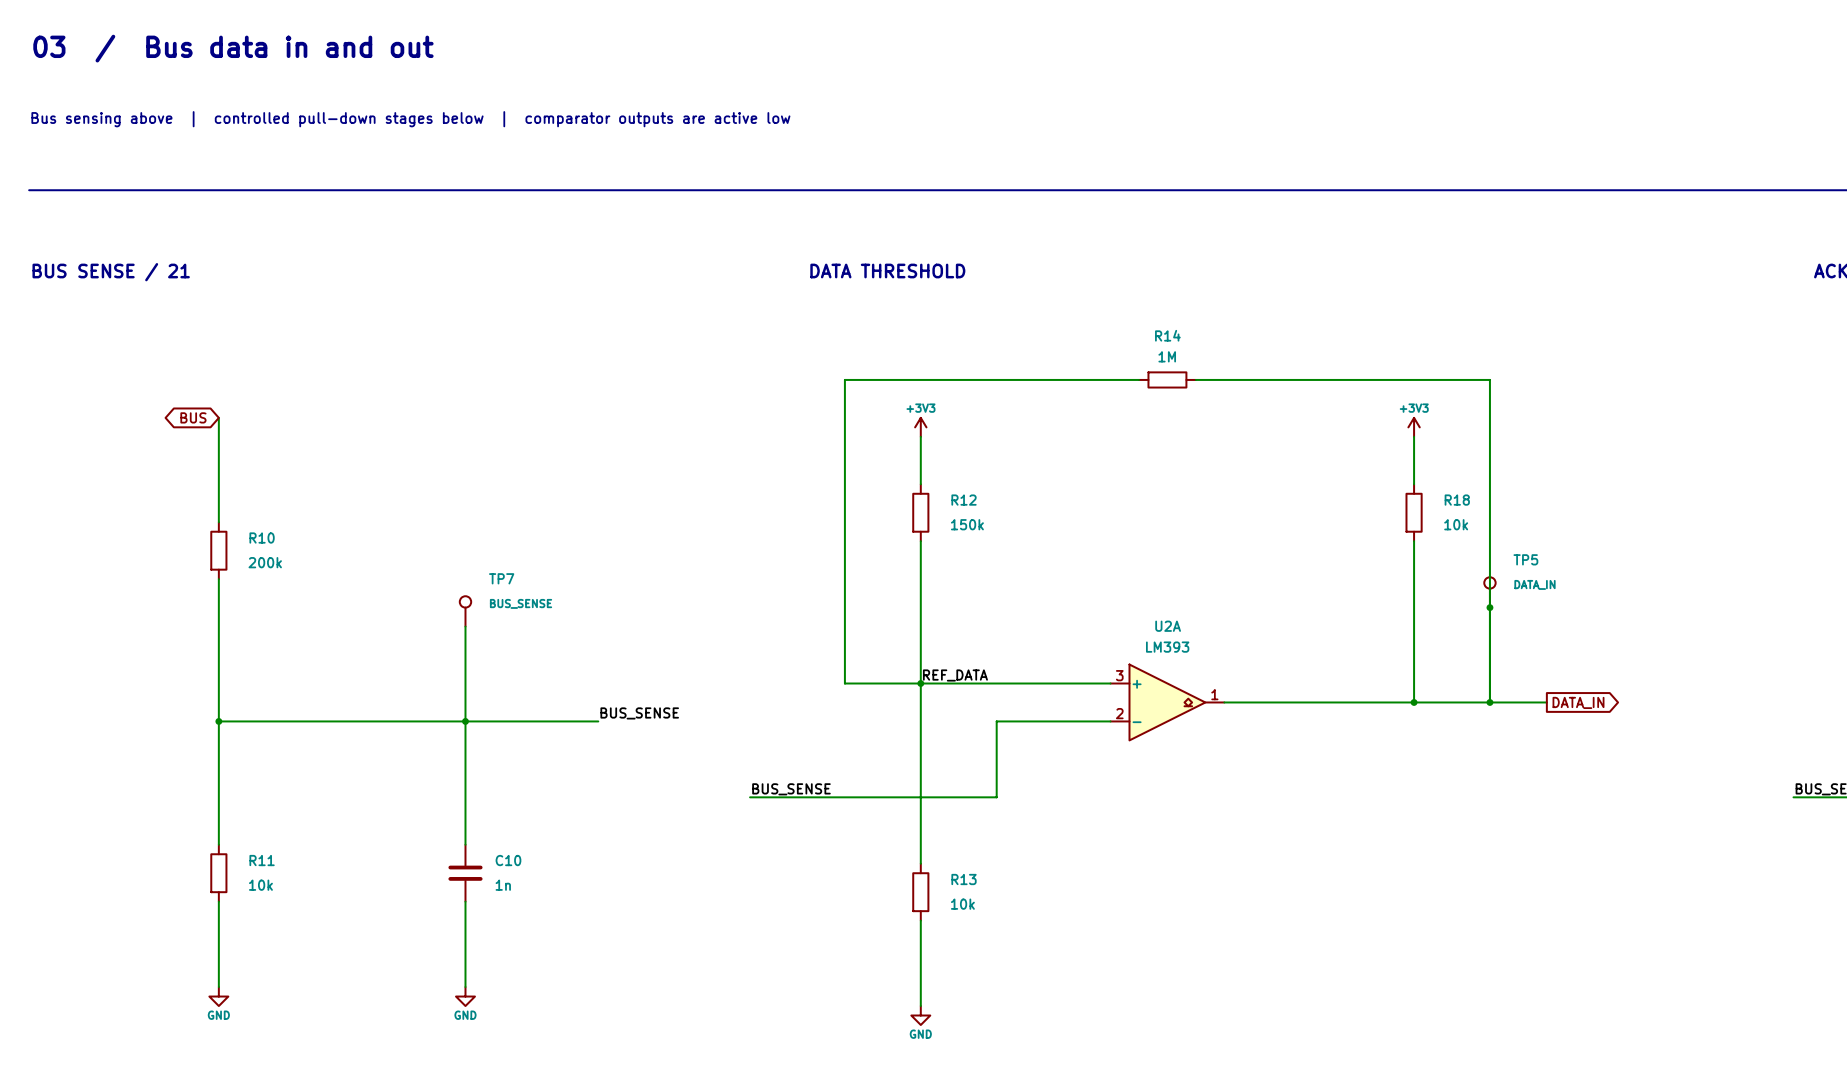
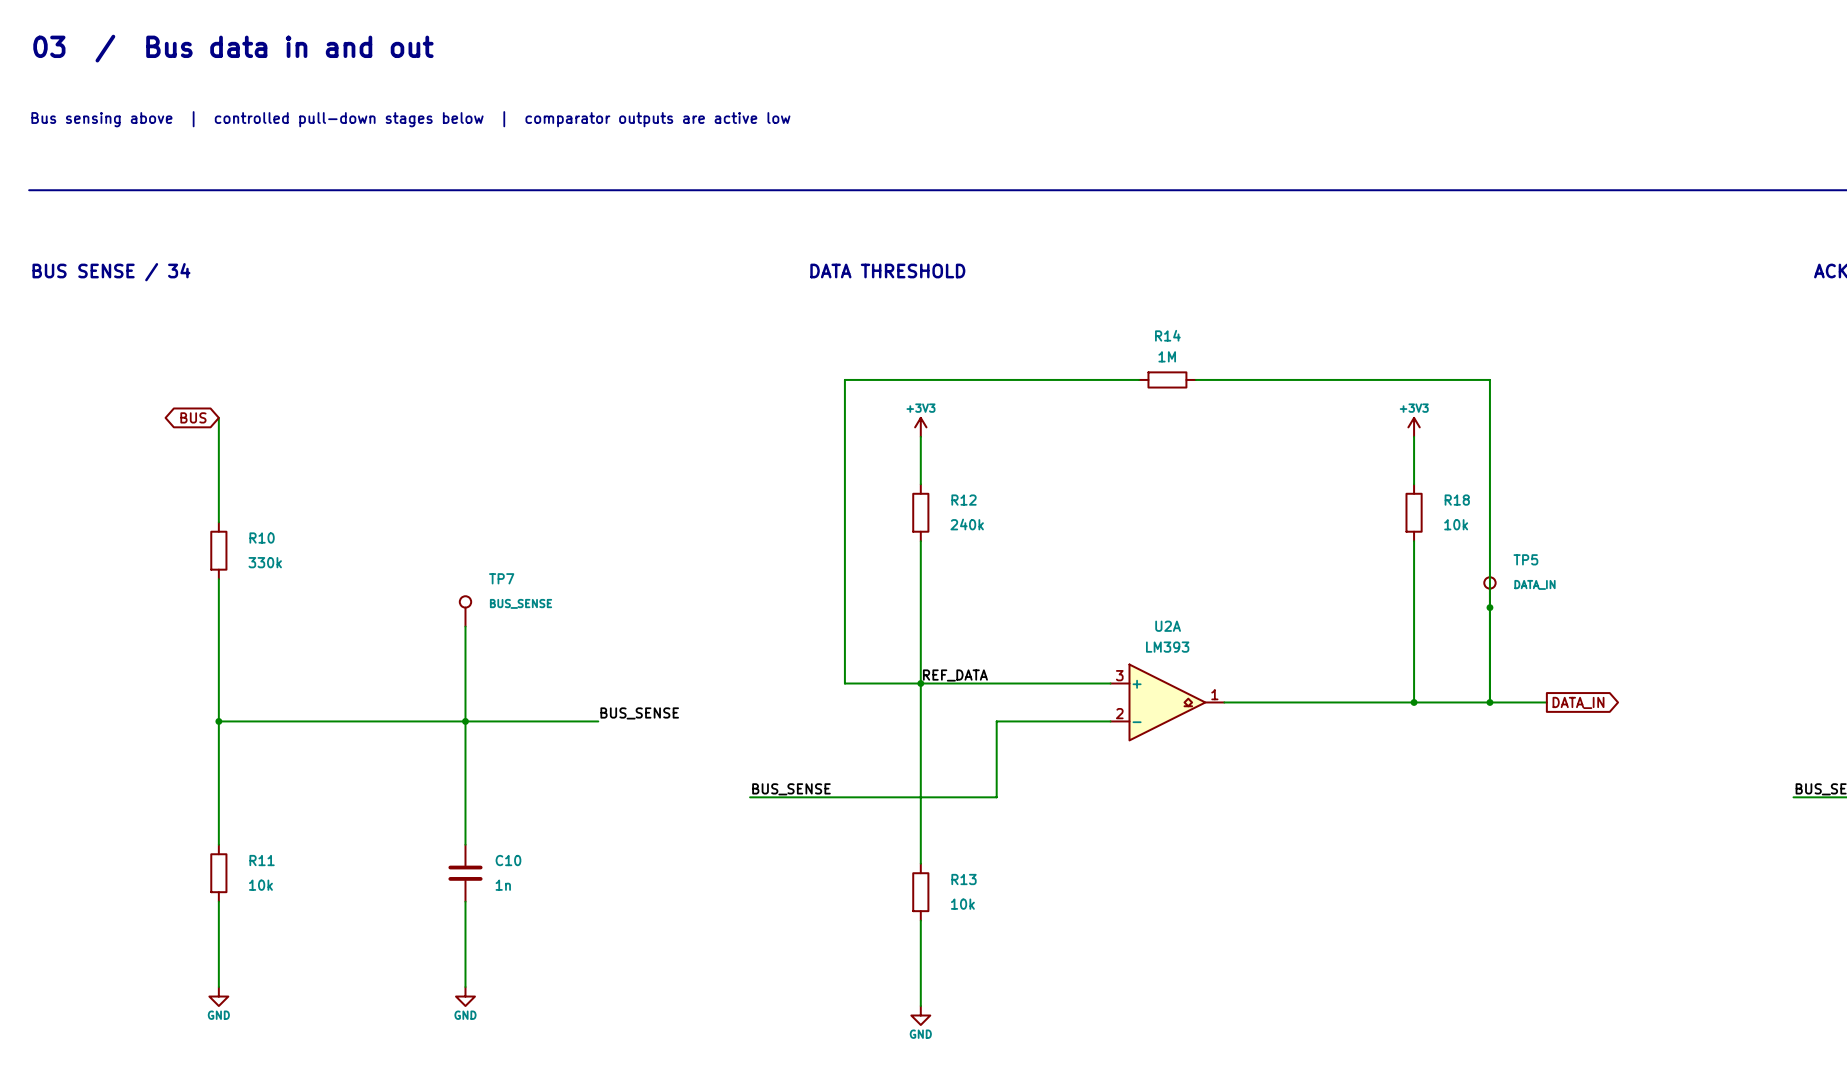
text: BUS SENSE / 21 (111, 272) -> BUS SENSE / 34 (111, 272)
R12 value: 150k (967, 524) -> 240k (967, 524)
R10 value: 200k (265, 562) -> 330k (265, 562)

